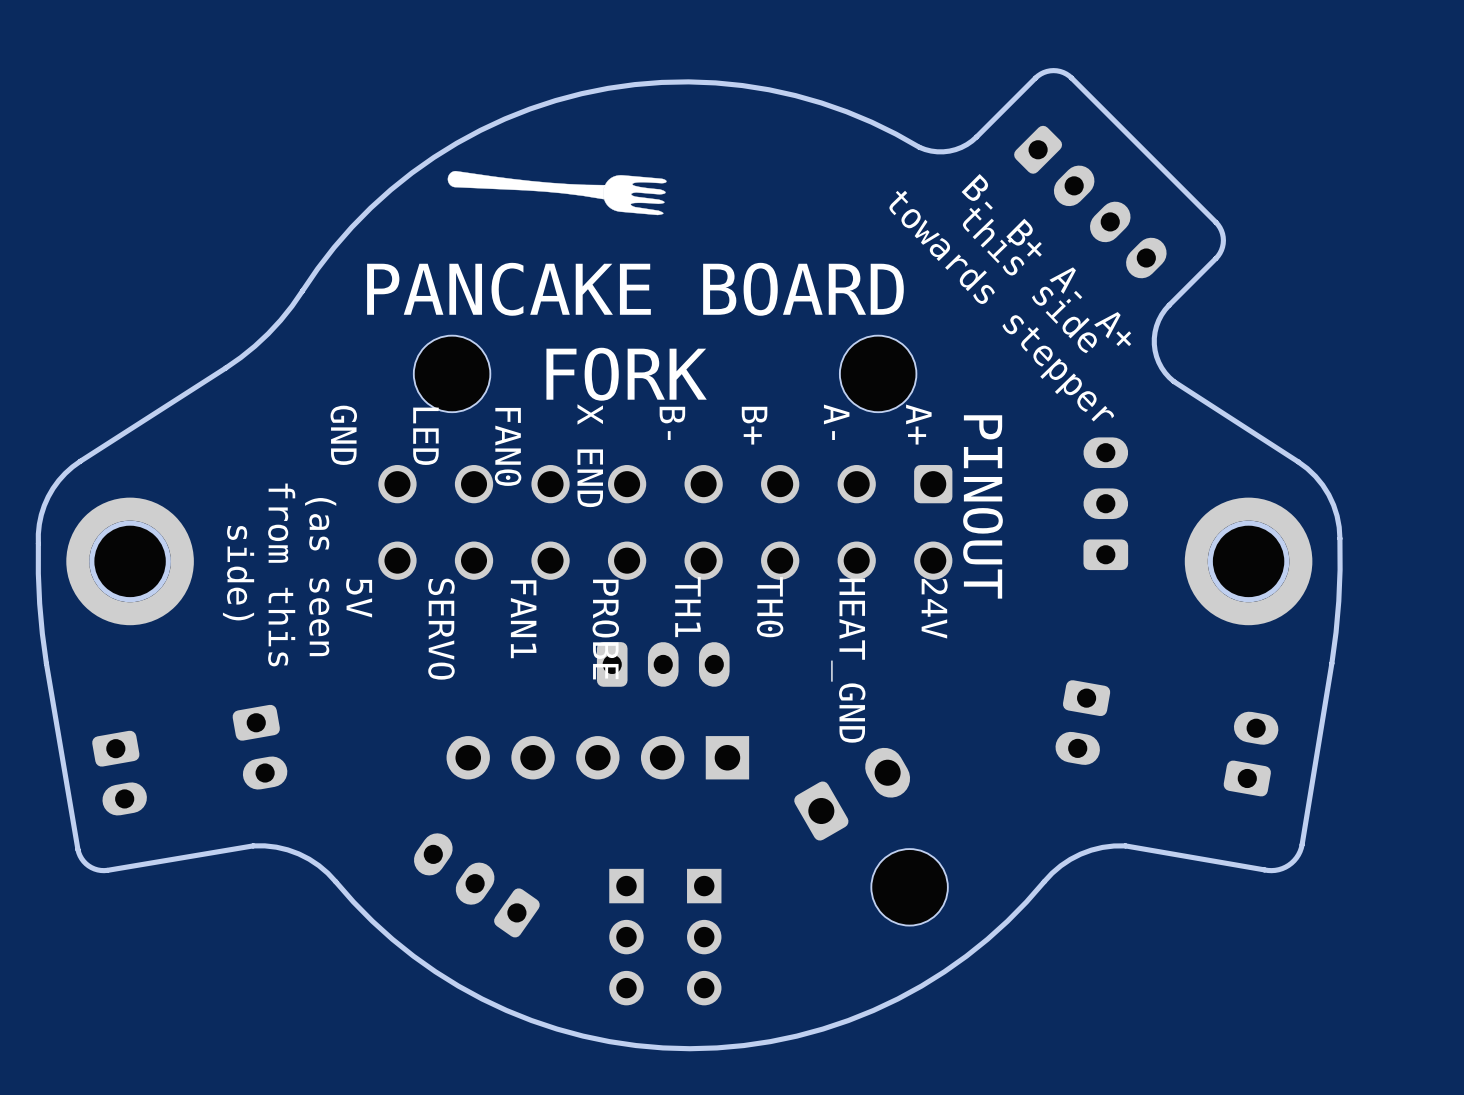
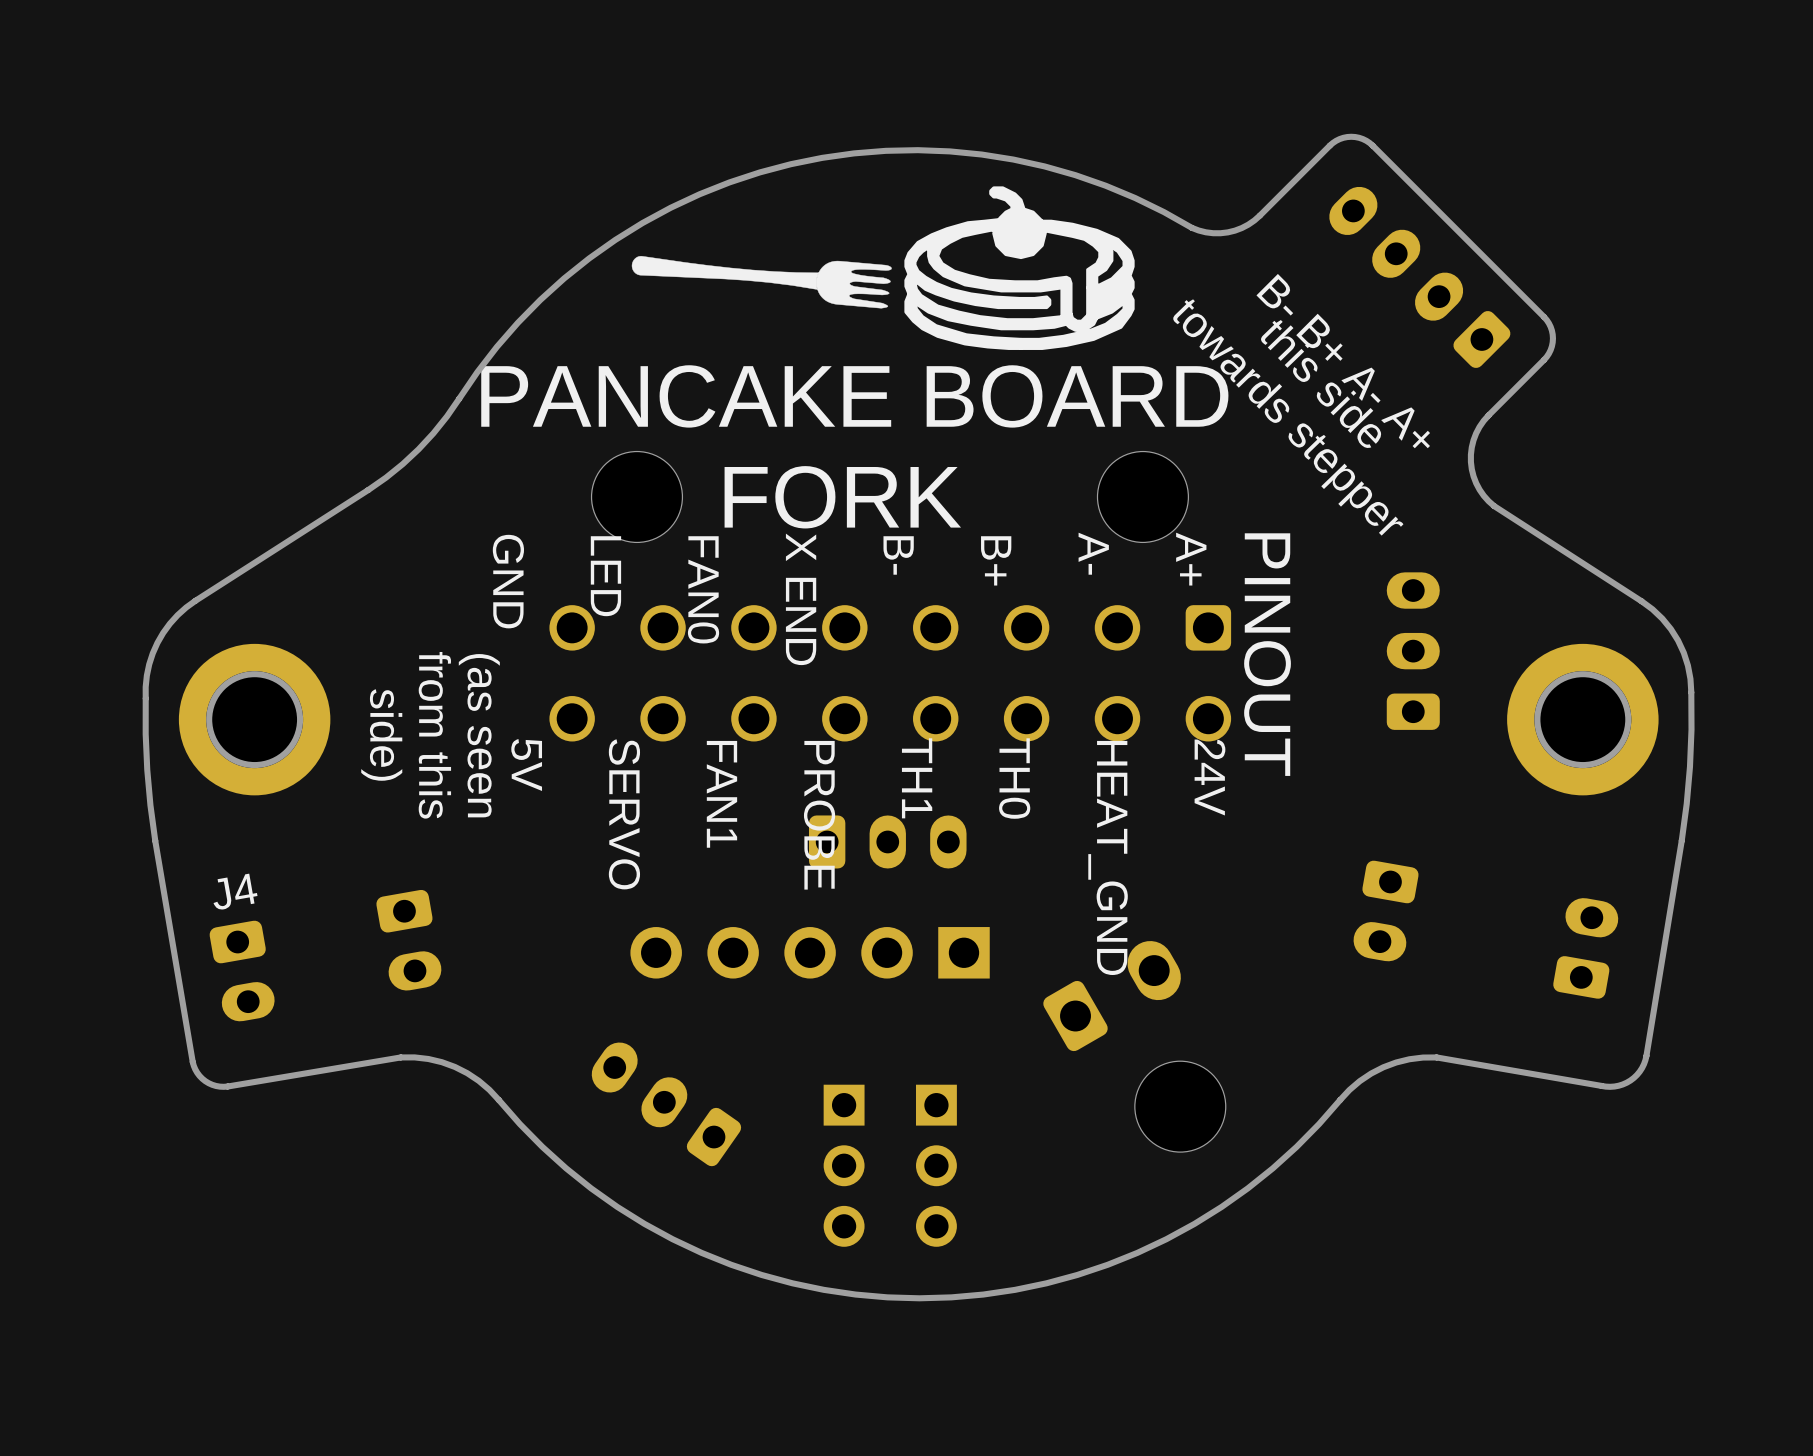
drawing: none -> [904, 186, 1135, 350]
part rotation: 0° (1090, 202) -> 180° (1419, 277)
J4 name: none -> J4 (235, 892)

